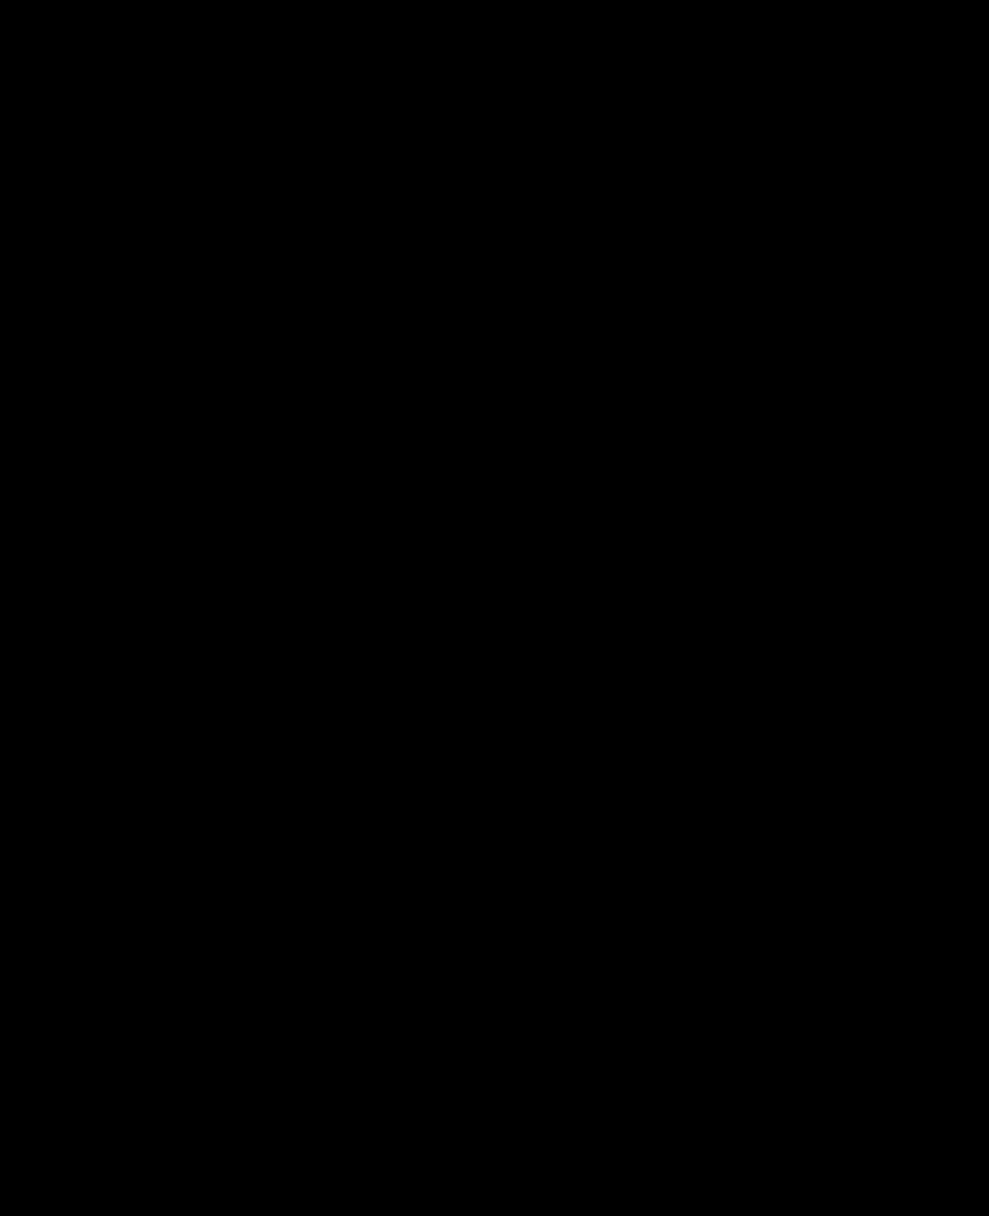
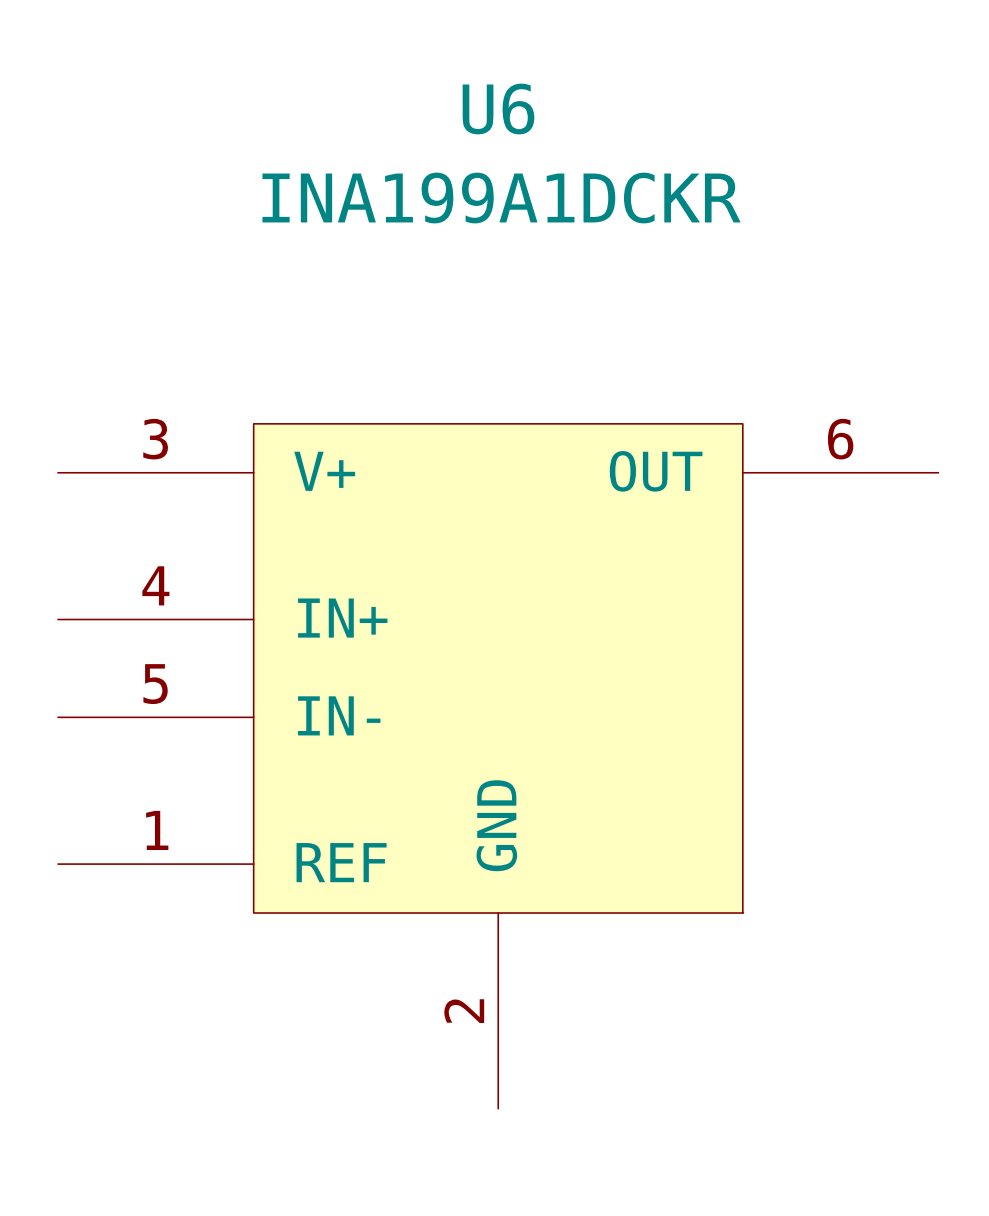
U6: none -> INA199A1DCKR (498, 766)

